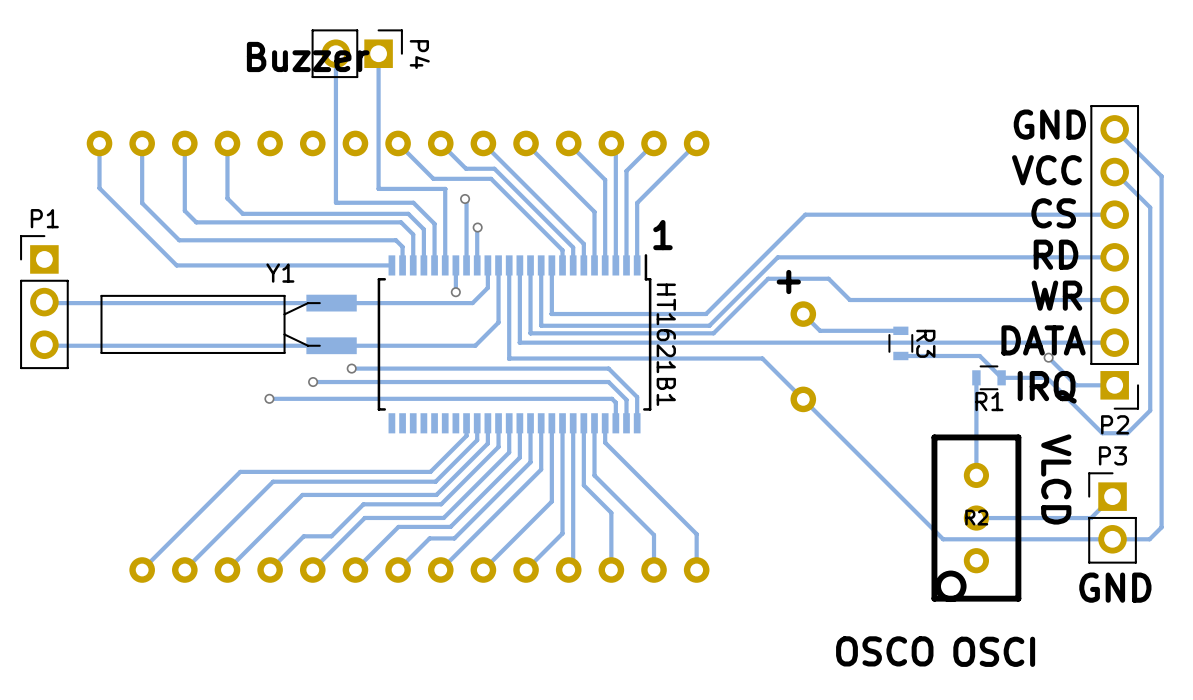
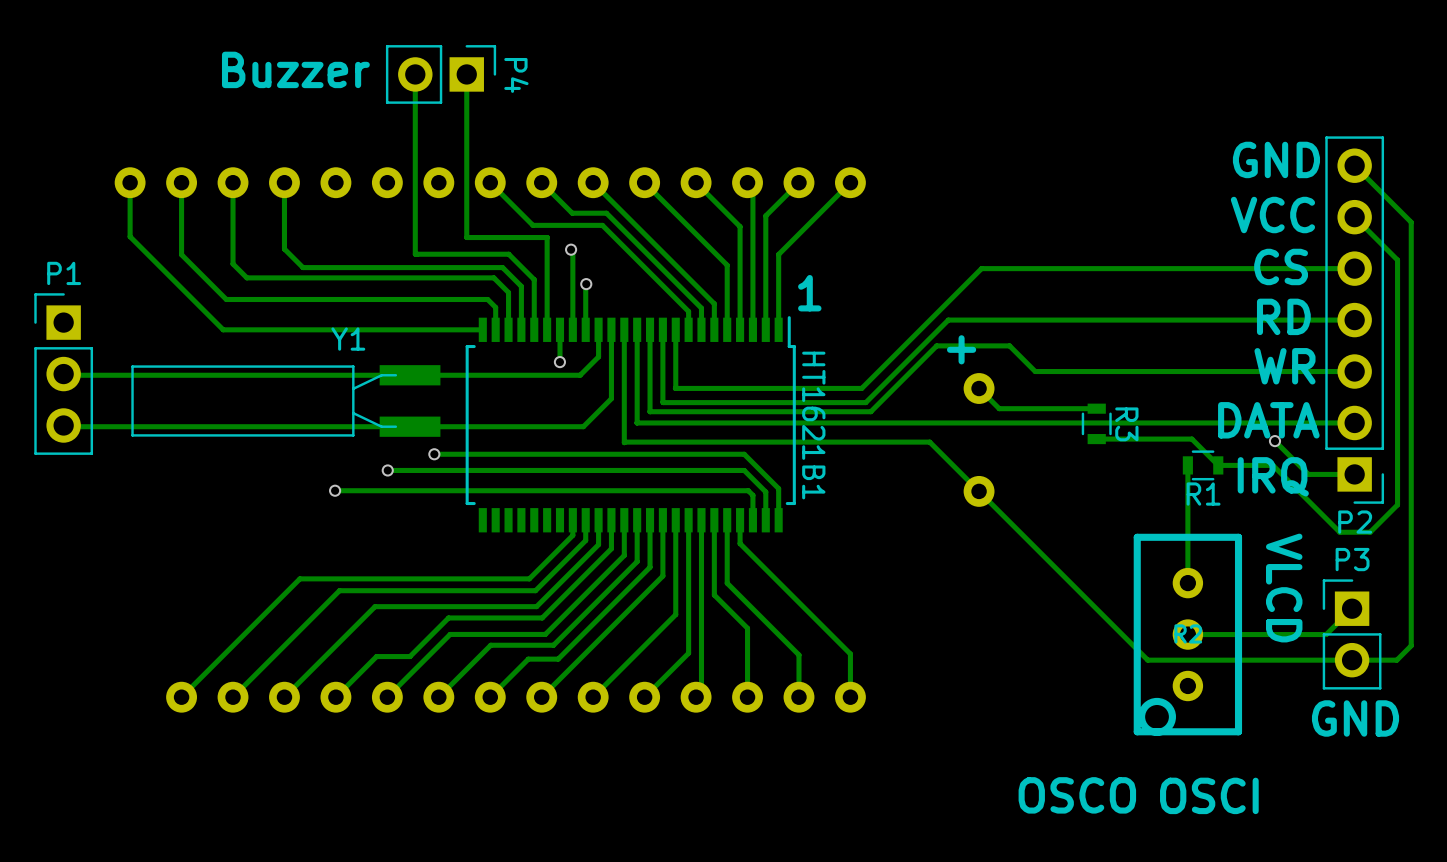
text position: Buzzer (308, 56) -> Buzzer (295, 69)

